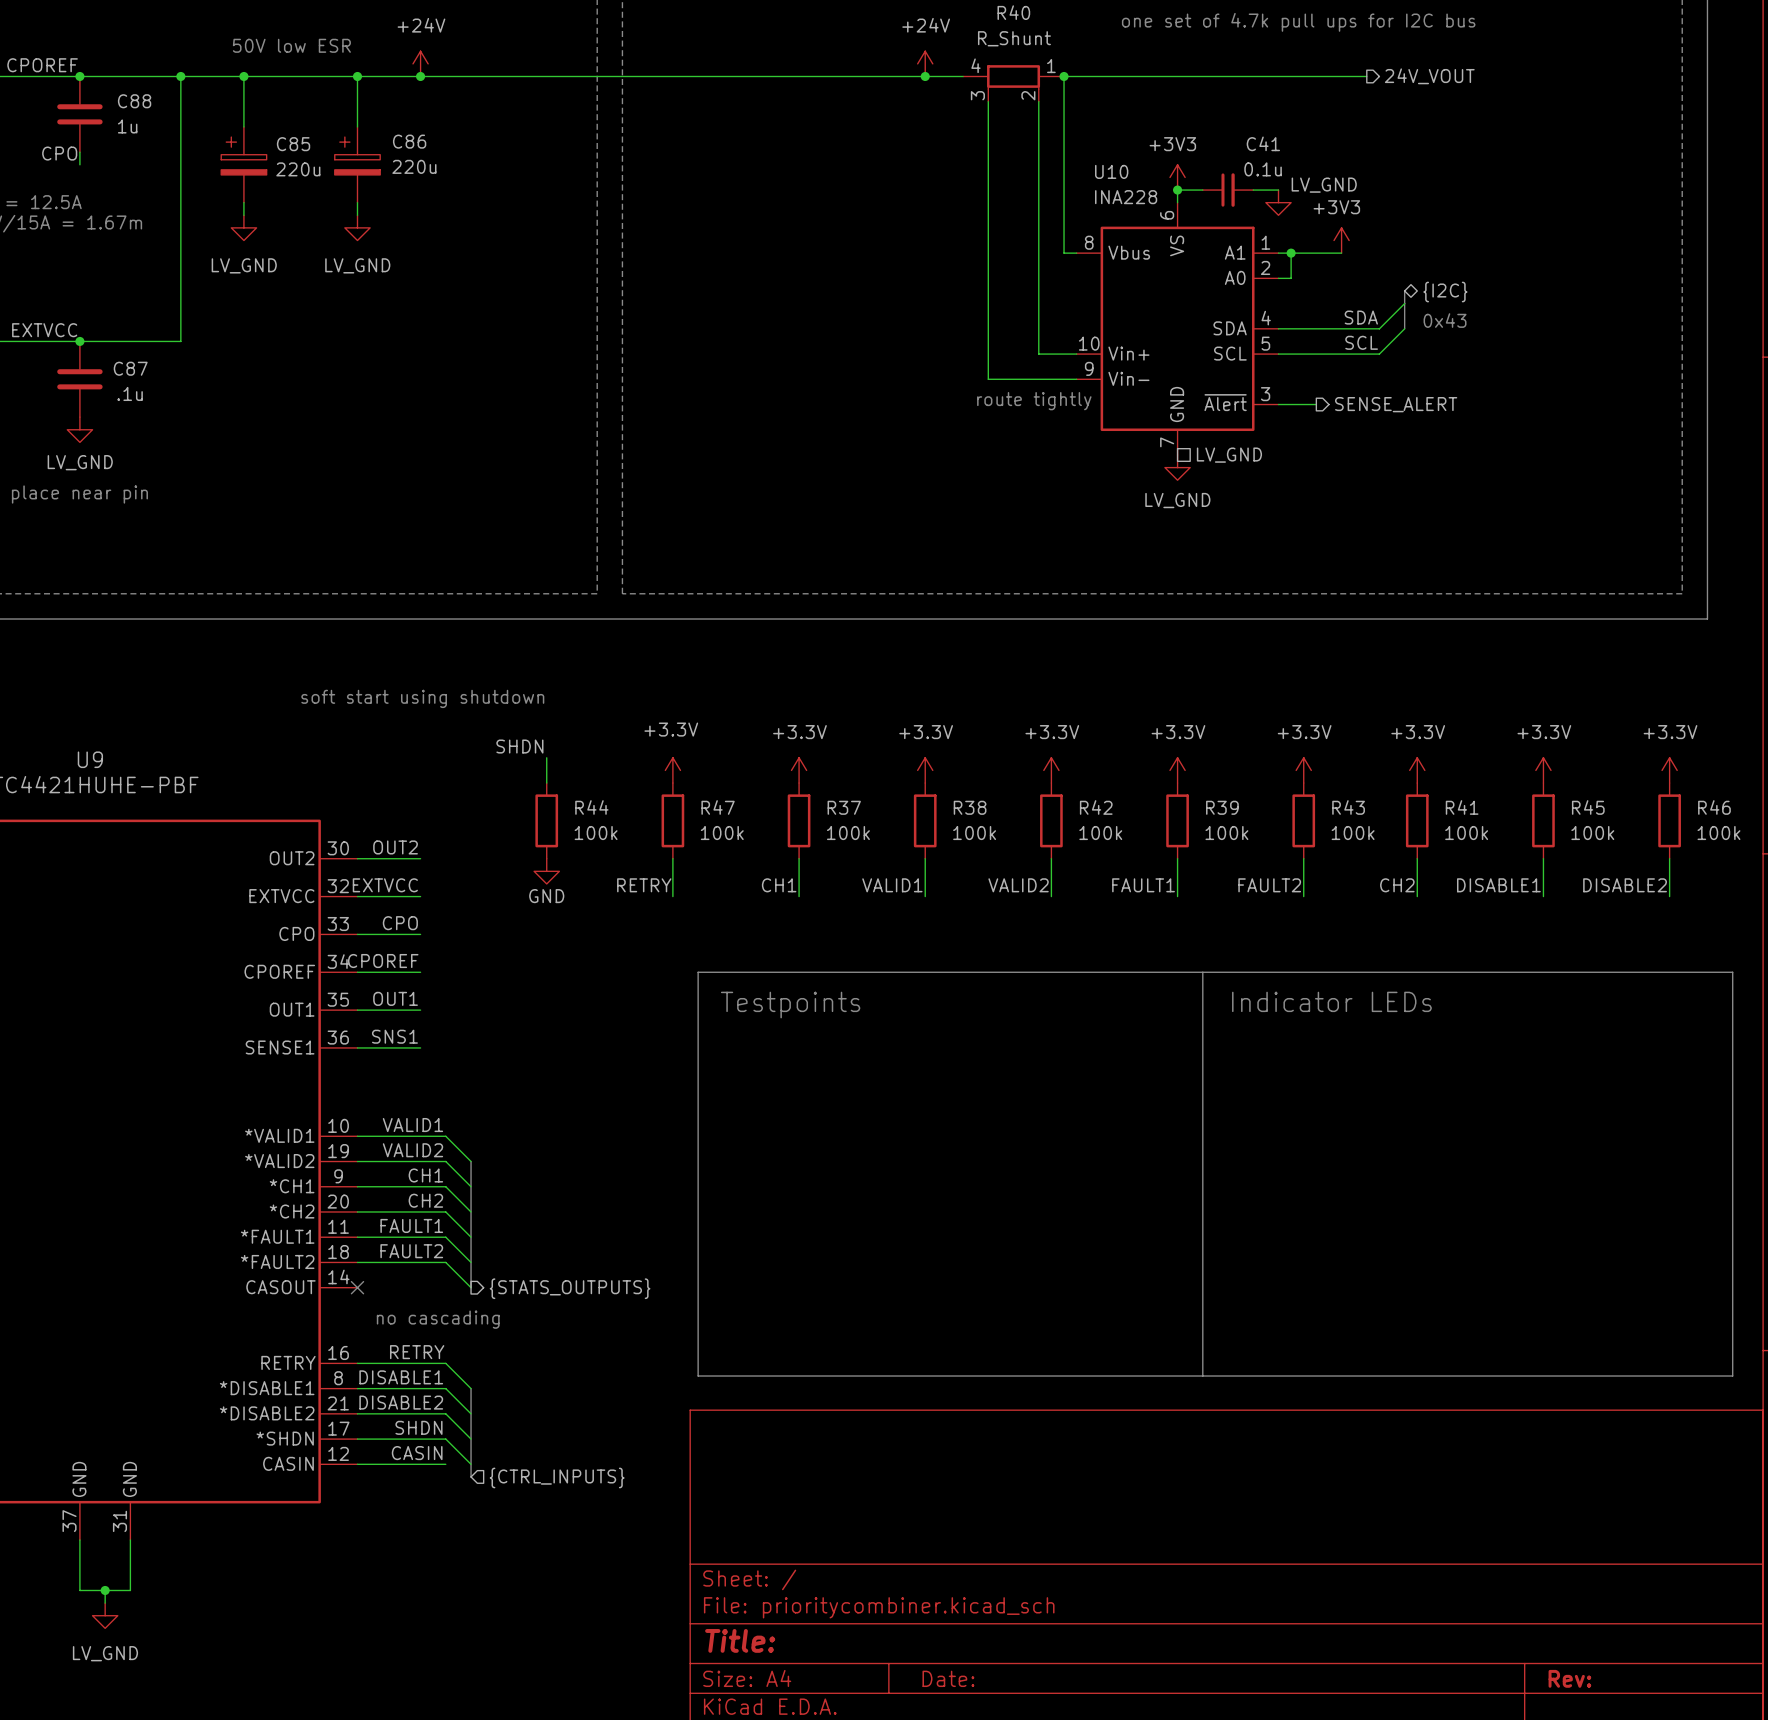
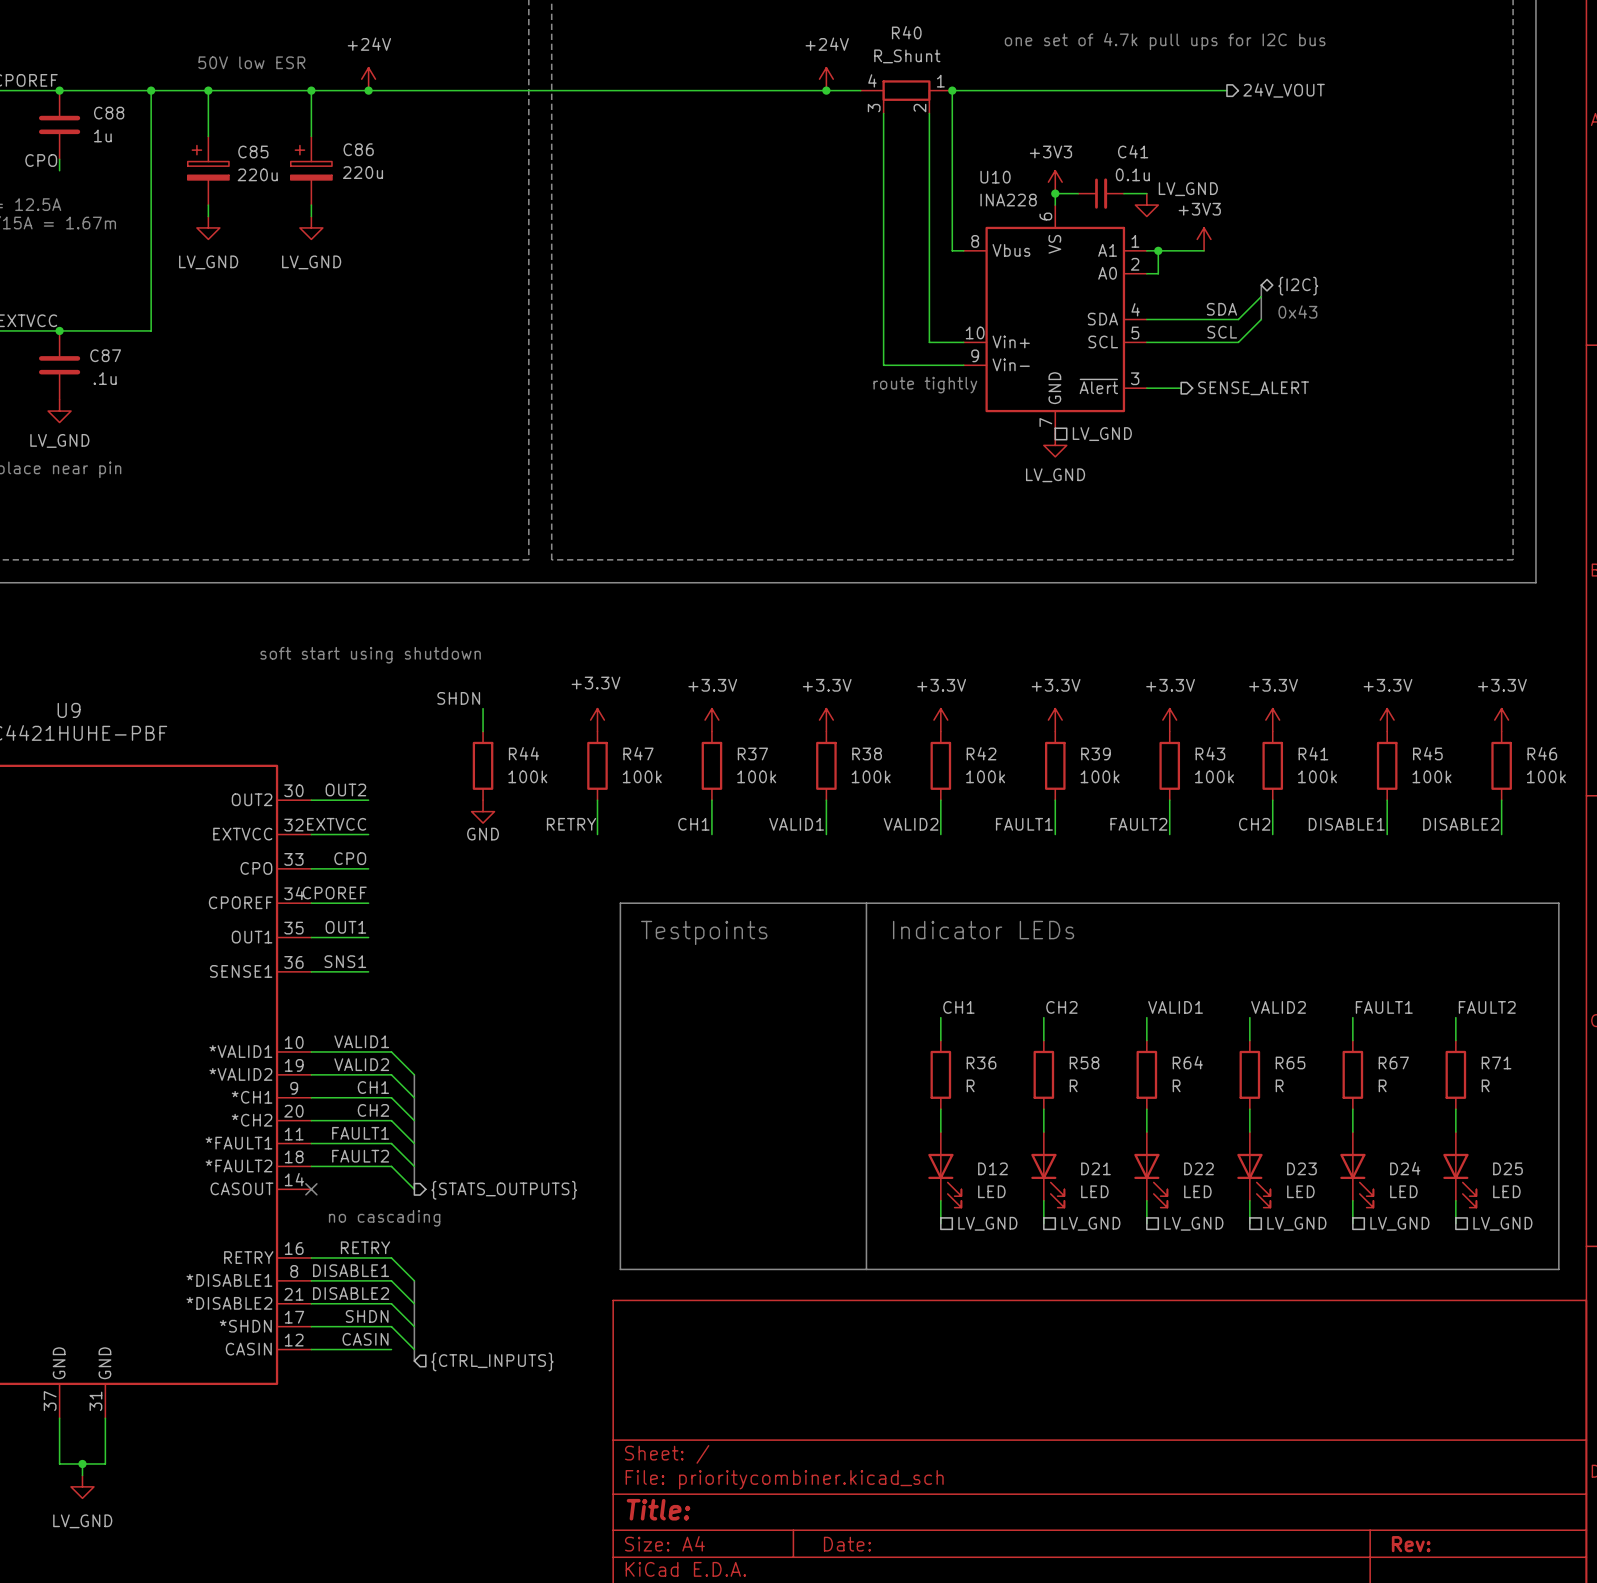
line: (1202, 972) (1202, 1376) -> (866, 903) (866, 1269)
text position: Indicator LEDs (1331, 1001) -> Indicator LEDs (983, 930)
label: none -> CH1 (958, 1007)
label: none -> CH2 (1061, 1007)
label: none -> VALID1 (1175, 1007)
label: none -> VALID2 (1278, 1007)
label: none -> FAULT1 (1384, 1007)
label: none -> FAULT2 (1487, 1007)
wire: none -> (940, 1017) (940, 1040)
wire: none -> (1043, 1017) (1043, 1040)
wire: none -> (1146, 1017) (1146, 1040)
wire: none -> (1249, 1017) (1249, 1040)
wire: none -> (1352, 1017) (1352, 1040)
wire: none -> (1455, 1017) (1455, 1040)
R36: none -> R (940, 1074)
R58: none -> R (1043, 1074)
R64: none -> R (1146, 1074)
R65: none -> R (1249, 1074)
R67: none -> R (1352, 1074)
R71: none -> R (1455, 1074)
wire: none -> (940, 1109) (940, 1132)
wire: none -> (1043, 1109) (1043, 1132)
wire: none -> (1146, 1109) (1146, 1132)
wire: none -> (1249, 1109) (1249, 1132)
wire: none -> (1352, 1109) (1352, 1132)
wire: none -> (1455, 1109) (1455, 1132)
D12: none -> LED (944, 1169)
D21: none -> LED (1047, 1169)
D22: none -> LED (1150, 1169)
D23: none -> LED (1253, 1169)
D24: none -> LED (1356, 1169)
D25: none -> LED (1459, 1169)
wire: none -> (940, 1200) (940, 1223)
wire: none -> (1043, 1200) (1043, 1223)
wire: none -> (1146, 1200) (1146, 1223)
wire: none -> (1249, 1200) (1249, 1223)
wire: none -> (1352, 1200) (1352, 1223)
wire: none -> (1455, 1200) (1455, 1223)
hierarchical label: none -> LV_GND (987, 1223)
hierarchical label: none -> LV_GND (1090, 1223)
hierarchical label: none -> LV_GND (1193, 1223)
hierarchical label: none -> LV_GND (1296, 1223)
hierarchical label: none -> LV_GND (1399, 1223)
hierarchical label: none -> LV_GND (1502, 1223)

